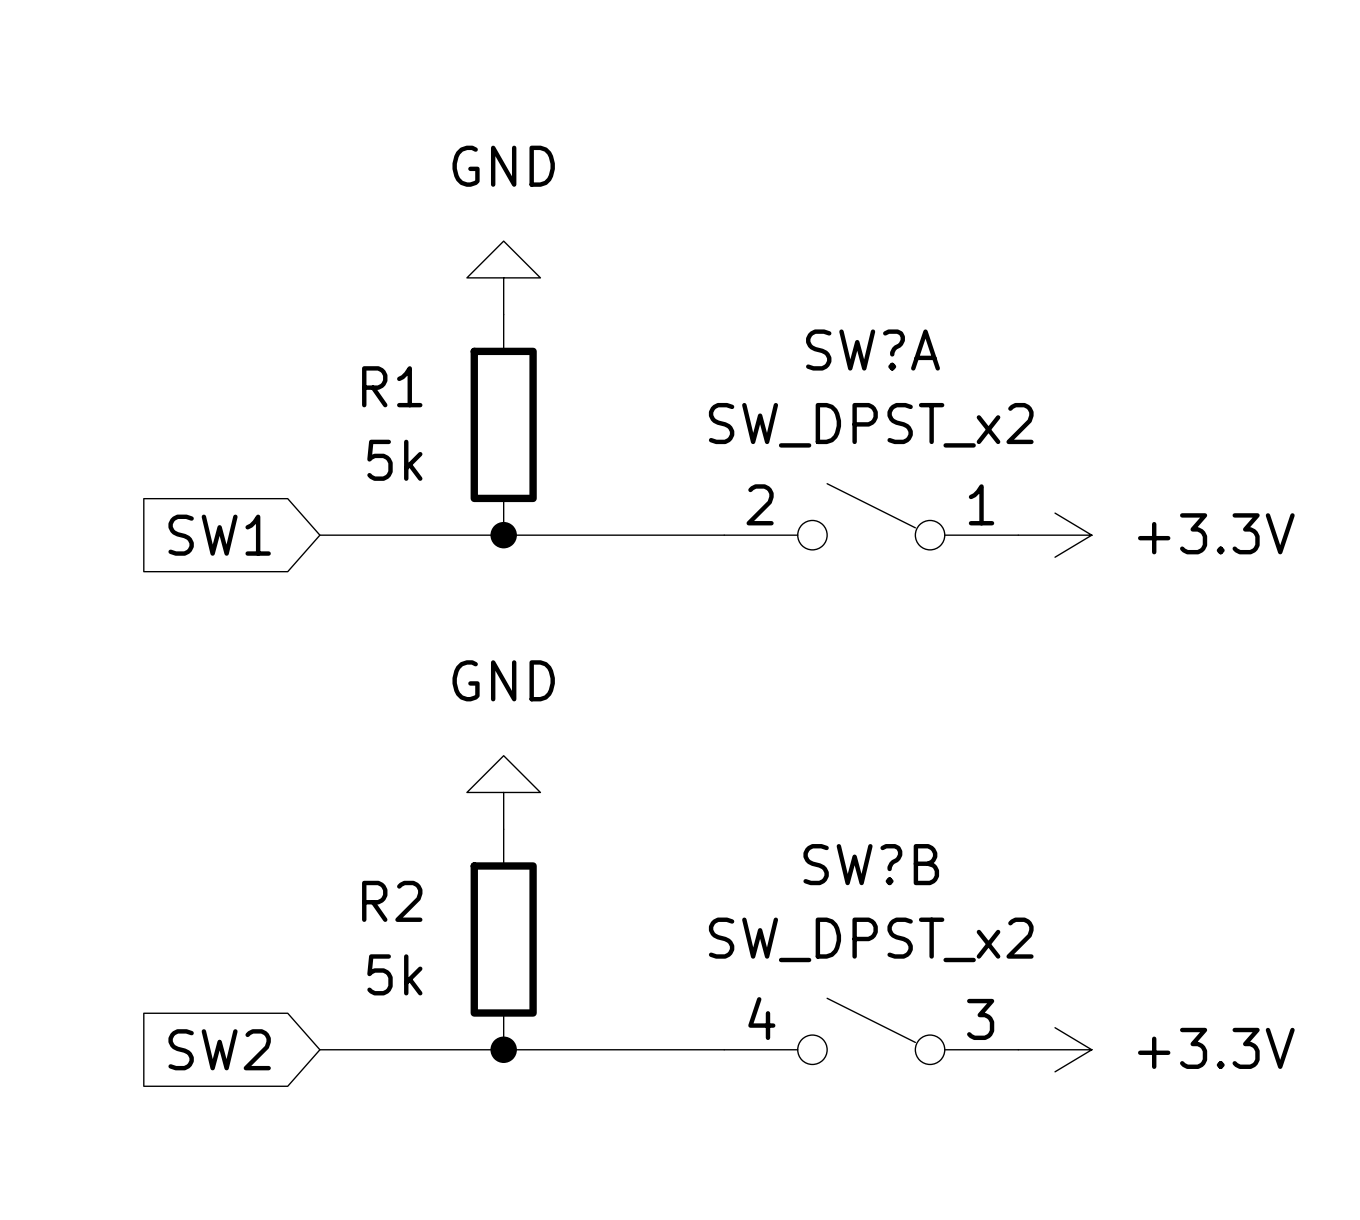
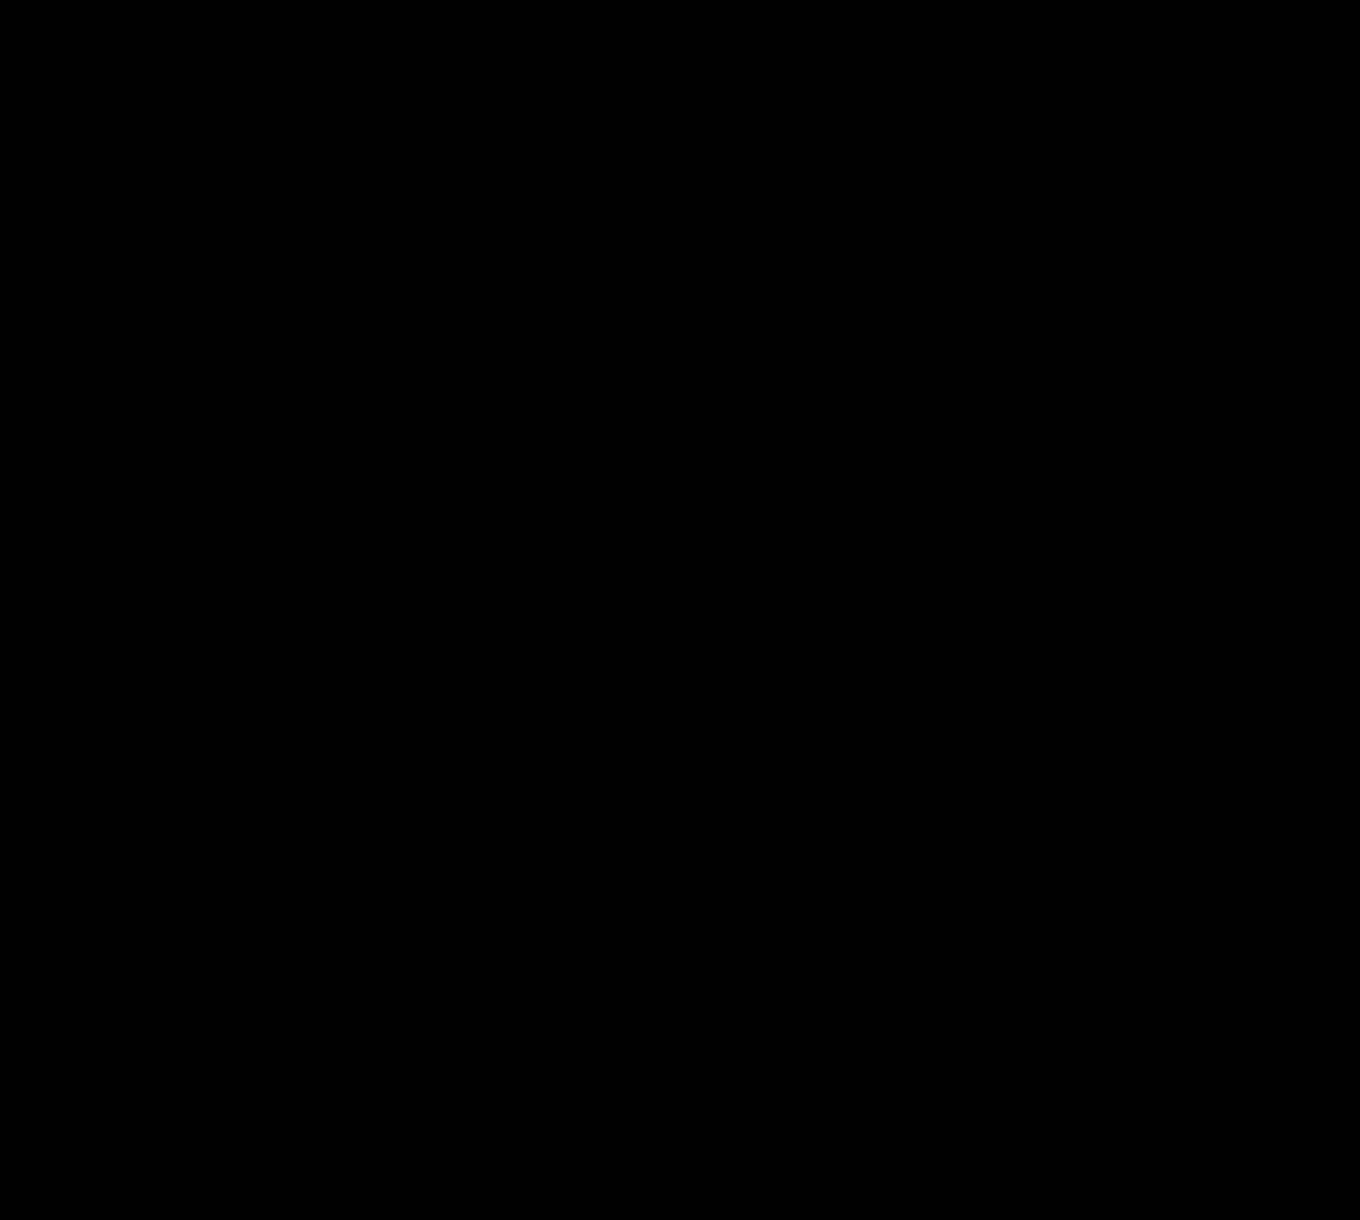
power symbol: GND (503, 277) -> none
R1: 5k (503, 424) -> none
SW?A: SW_DPST_x2 (871, 516) -> none
global label: SW1 (219, 535) -> none
wire: (319, 535) (724, 535) -> none
junction: (503, 535) -> none
power symbol: +3.3V (1055, 535) -> none
power symbol: GND (503, 792) -> none
R2: 5k (503, 939) -> none
SW?B: SW_DPST_x2 (871, 1031) -> none
global label: SW2 (219, 1049) -> none
wire: (319, 1049) (724, 1049) -> none
junction: (503, 1049) -> none
power symbol: +3.3V (1055, 1049) -> none

